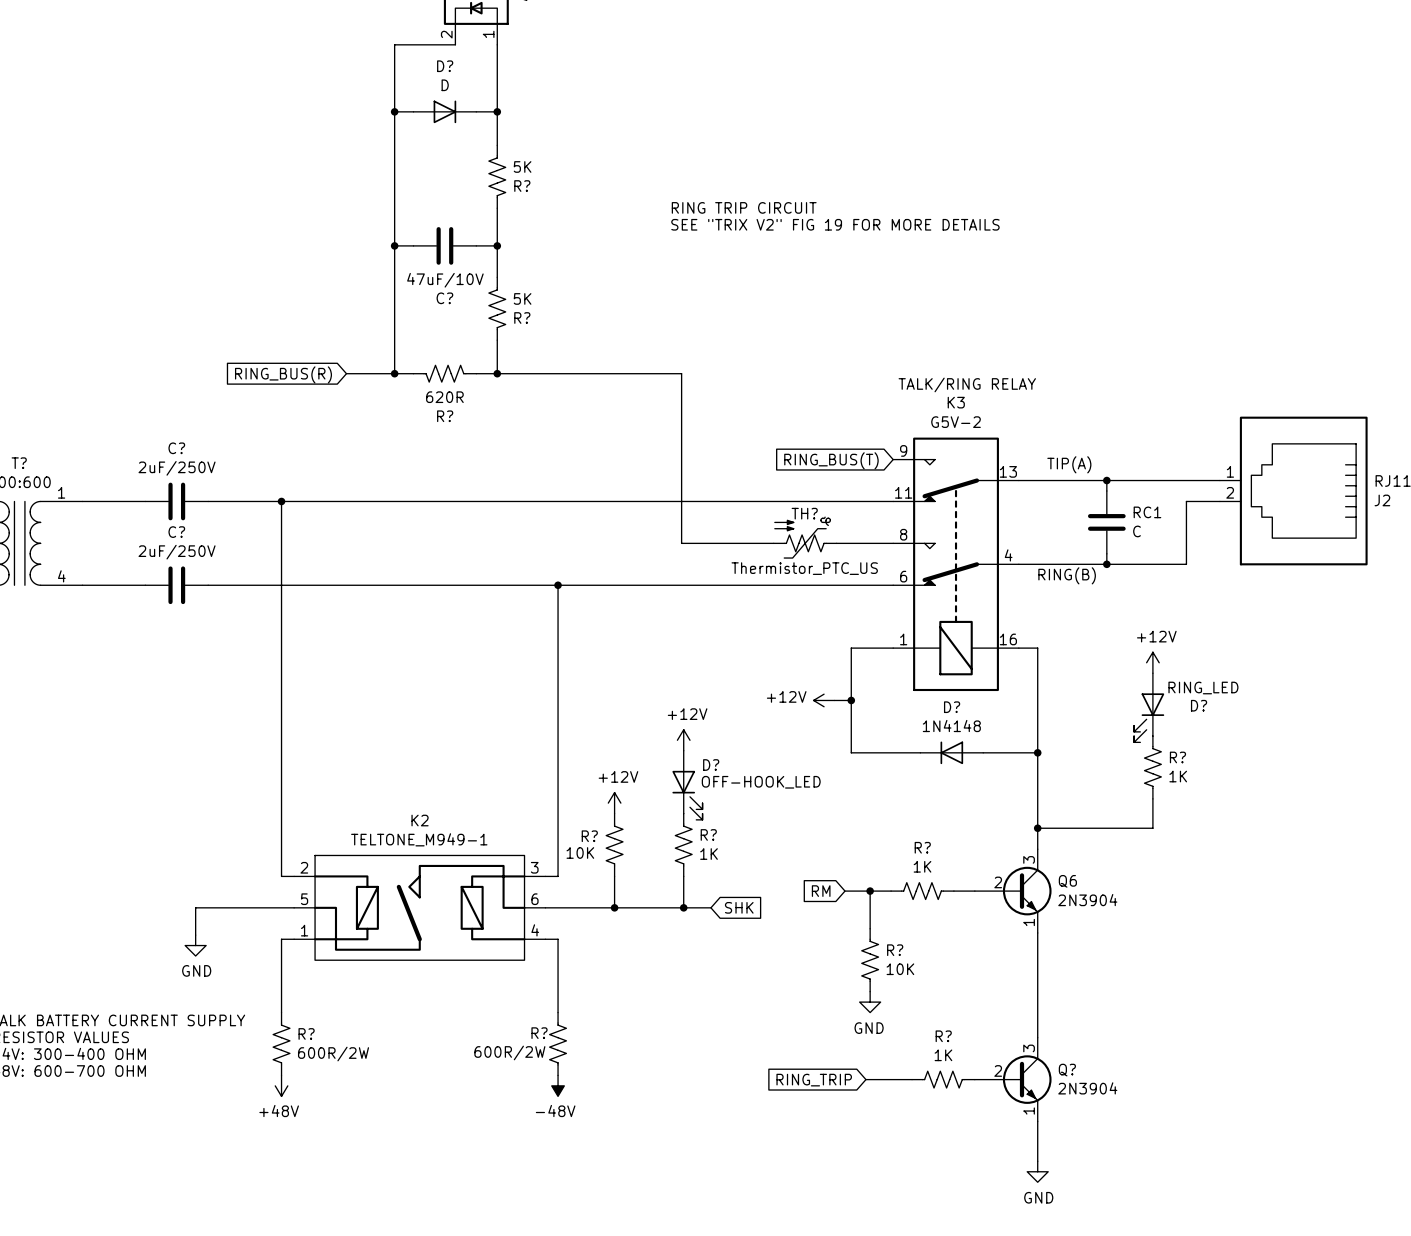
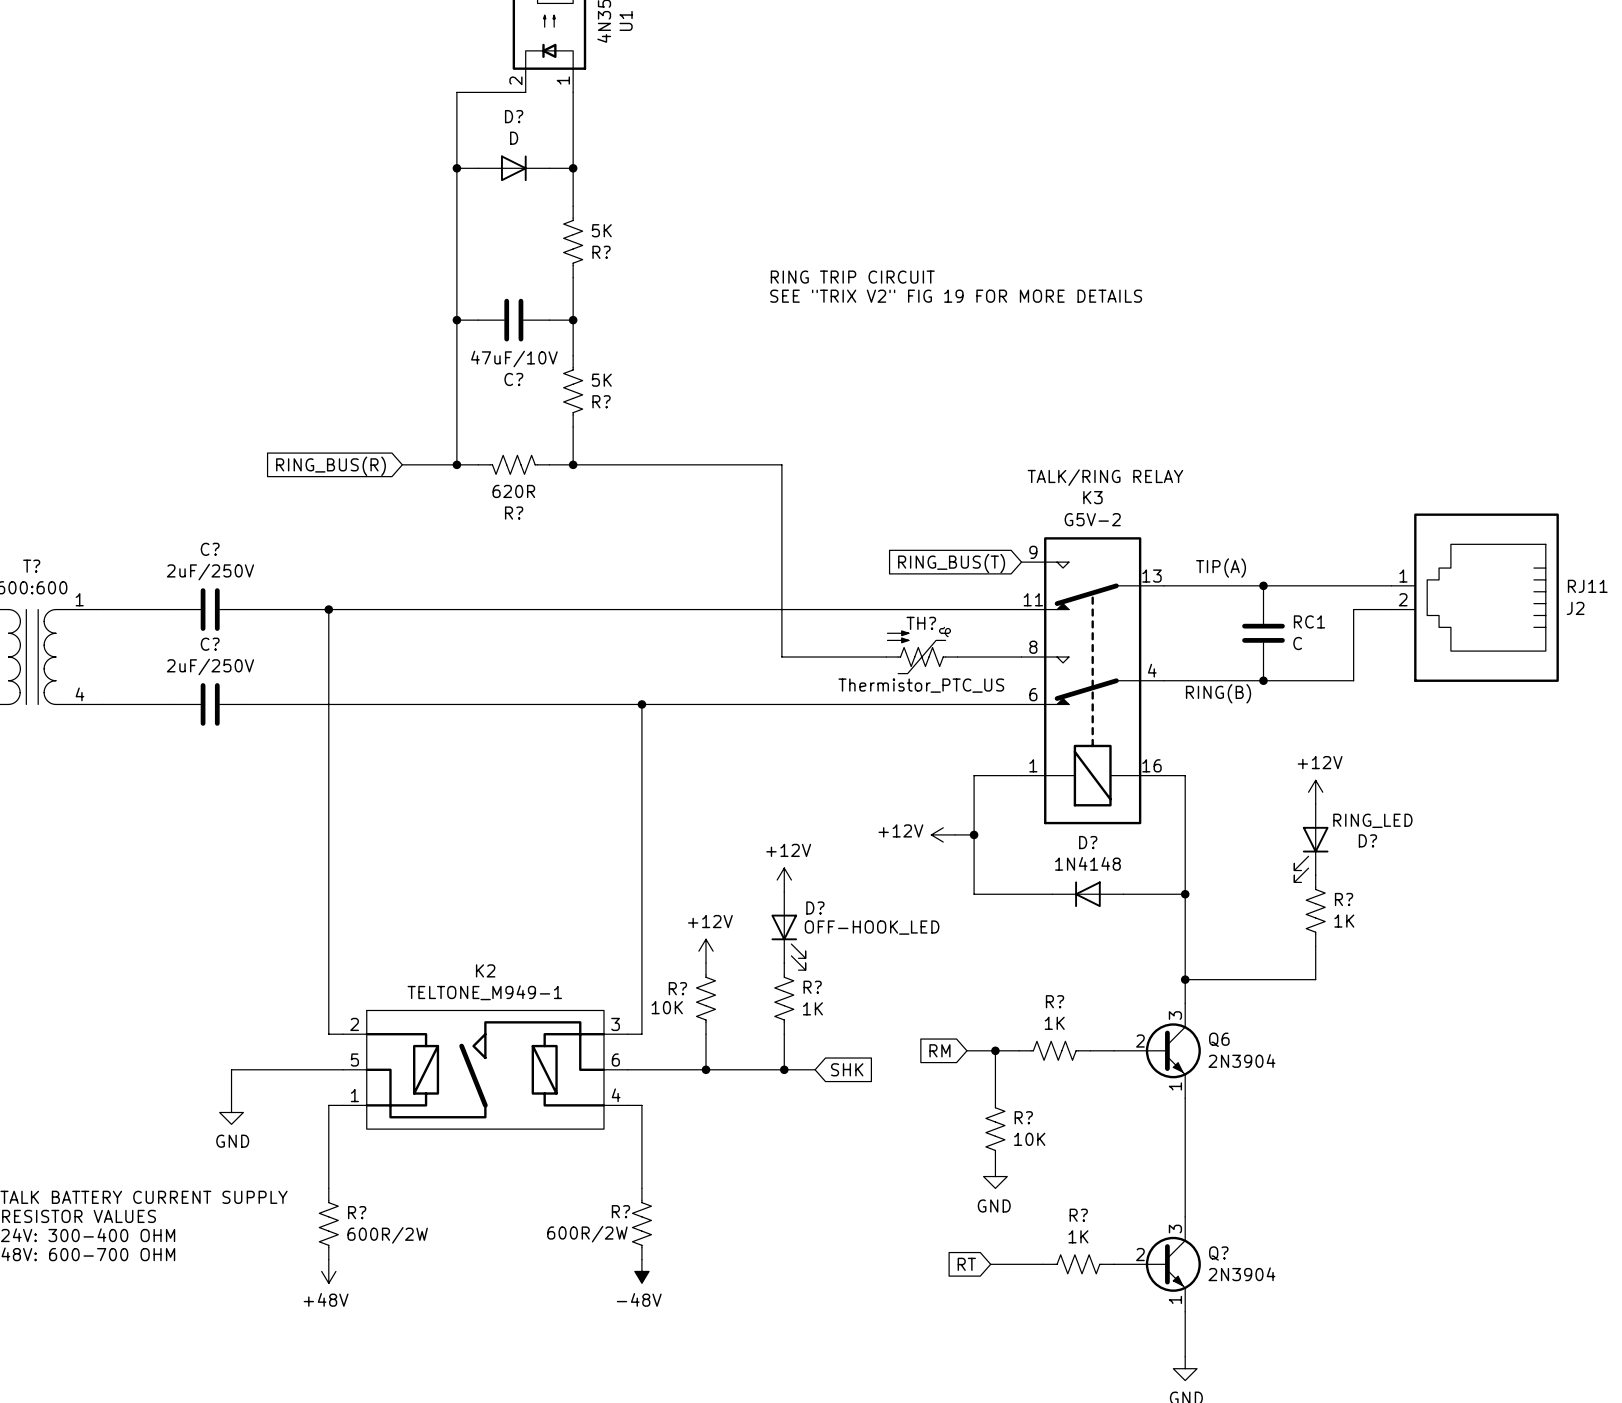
global label: RING_TRIP (814, 1080) -> RT (966, 1264)

